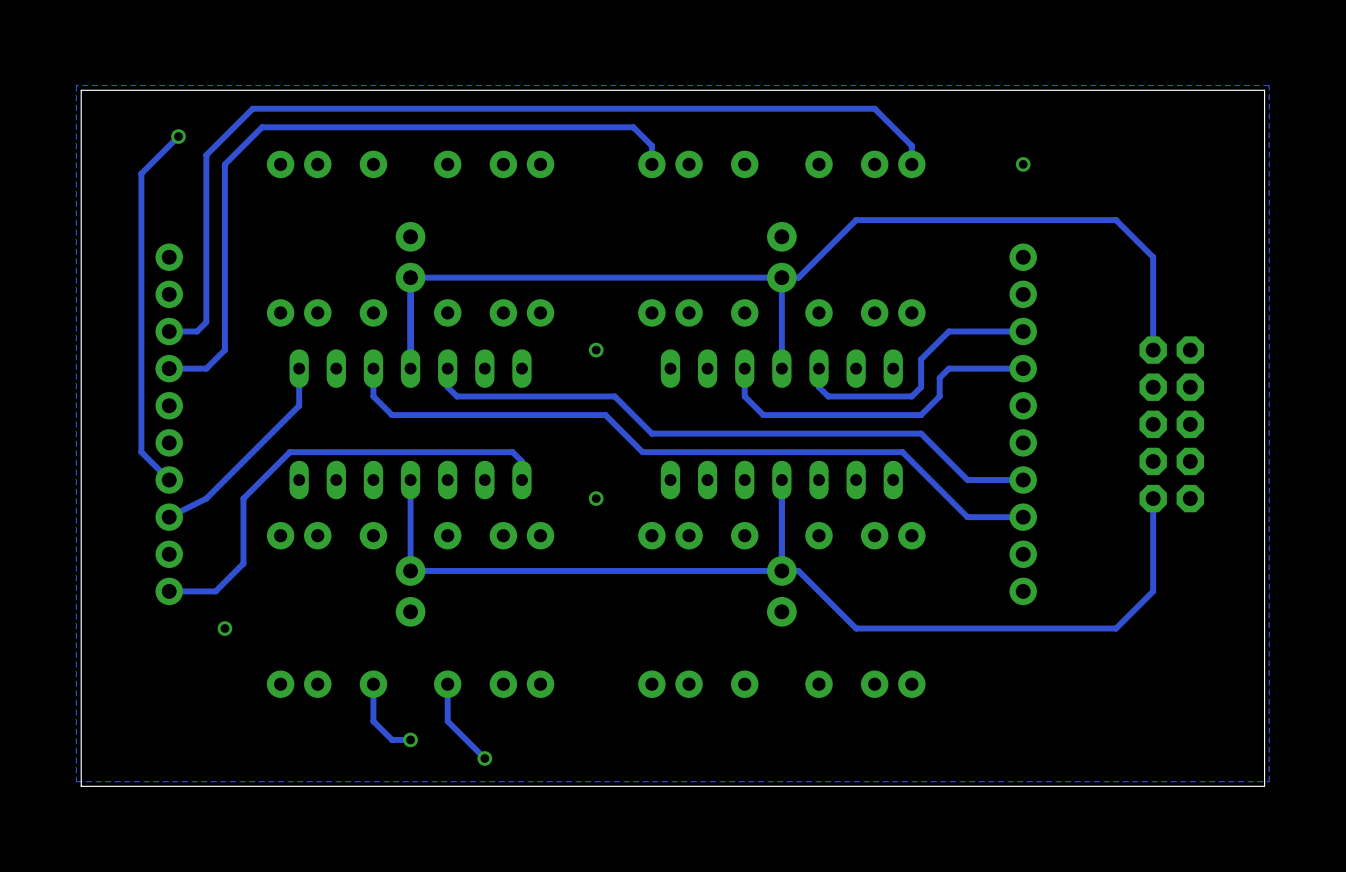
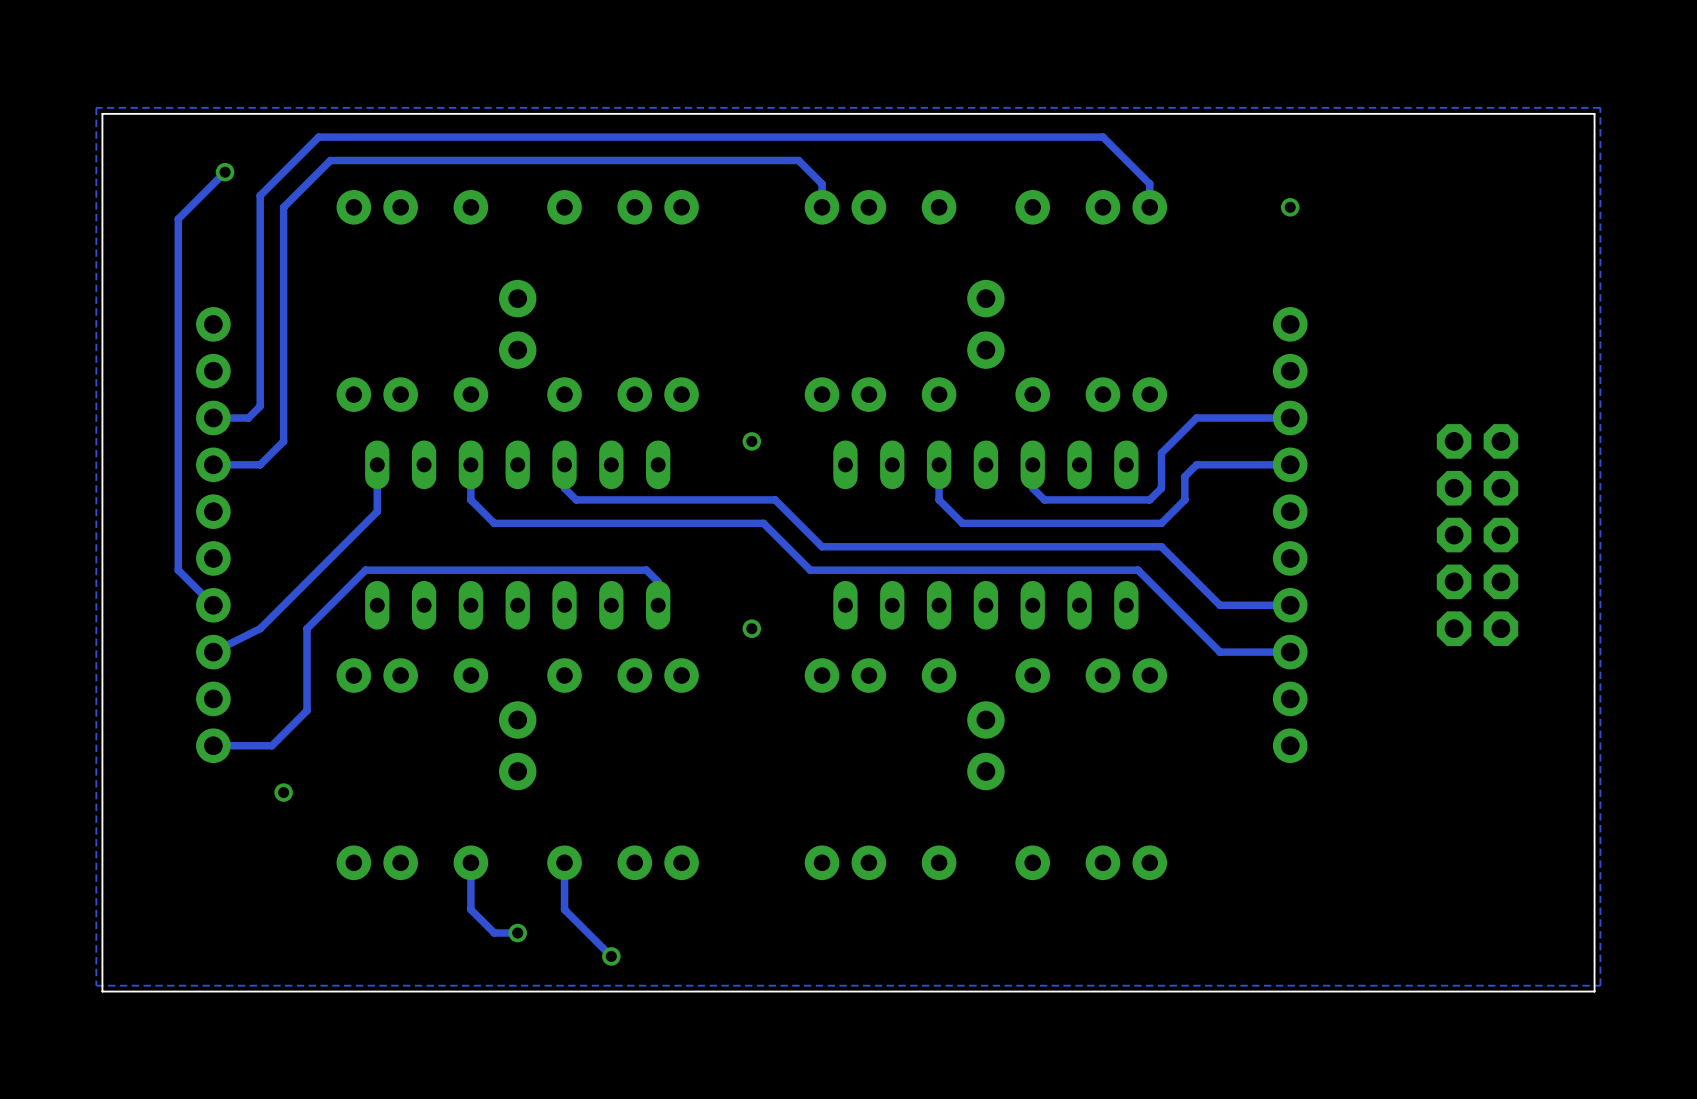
track: (781, 277) (781, 368) -> none
track: (1153, 350) (1153, 257) (1116, 220) (856, 220) (798, 277) (412, 277) (410, 275) (410, 368) -> none
track: (781, 480) (781, 572) (780, 570) (410, 570) (410, 480) -> none
track: (1153, 498) (1153, 591) (1116, 628) (856, 628) (798, 570) (781, 570) -> none

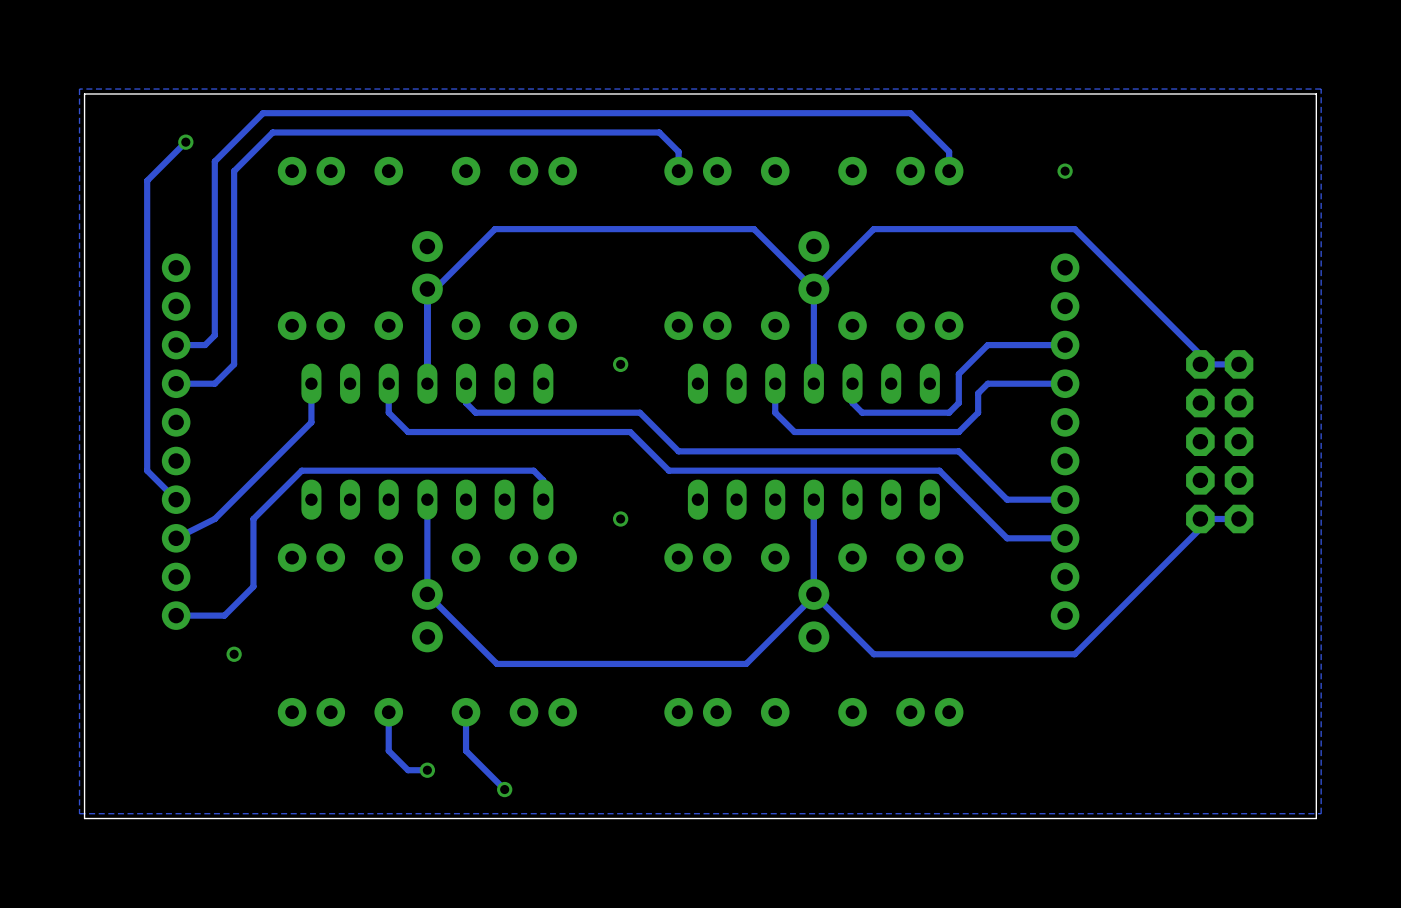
track: none -> (813, 289) (873, 229) (1074, 229) (1200, 354) (1200, 364) (1239, 364)
track: none -> (813, 289) (813, 383)
track: none -> (813, 289) (753, 229) (495, 229) (437, 287) (427, 287) (427, 383)
track: none -> (813, 499) (813, 596) (746, 663) (496, 663) (427, 594) (427, 499)
track: none -> (1239, 518) (1200, 518) (1200, 528) (1074, 654) (873, 654) (813, 594)

